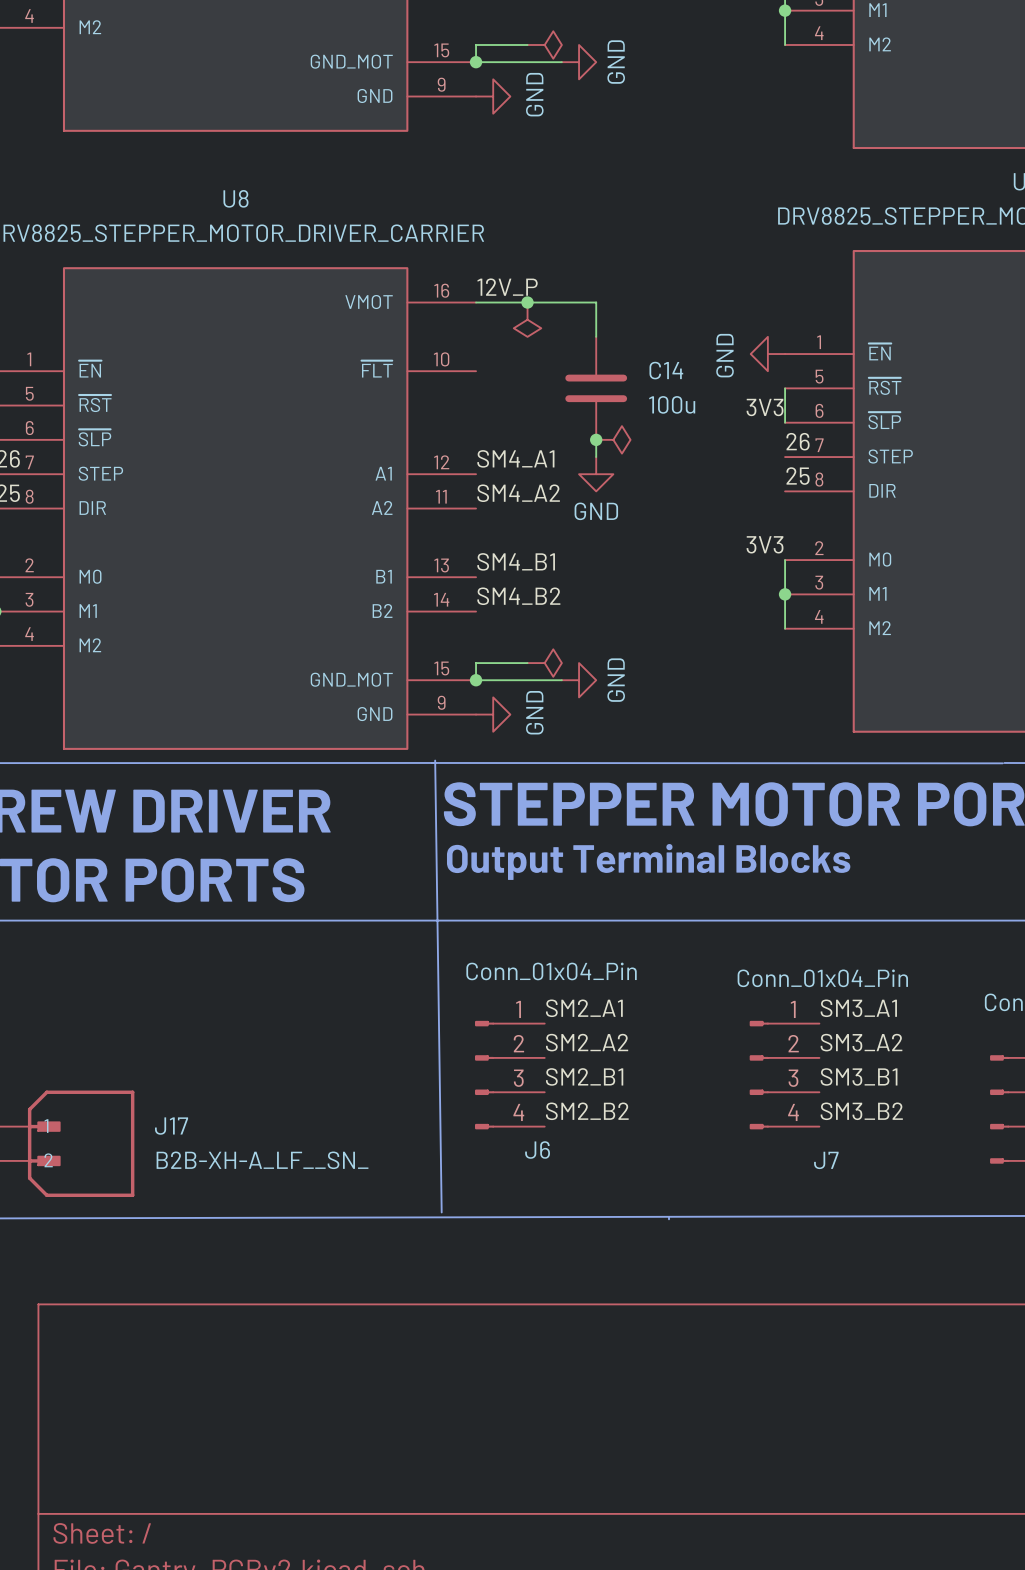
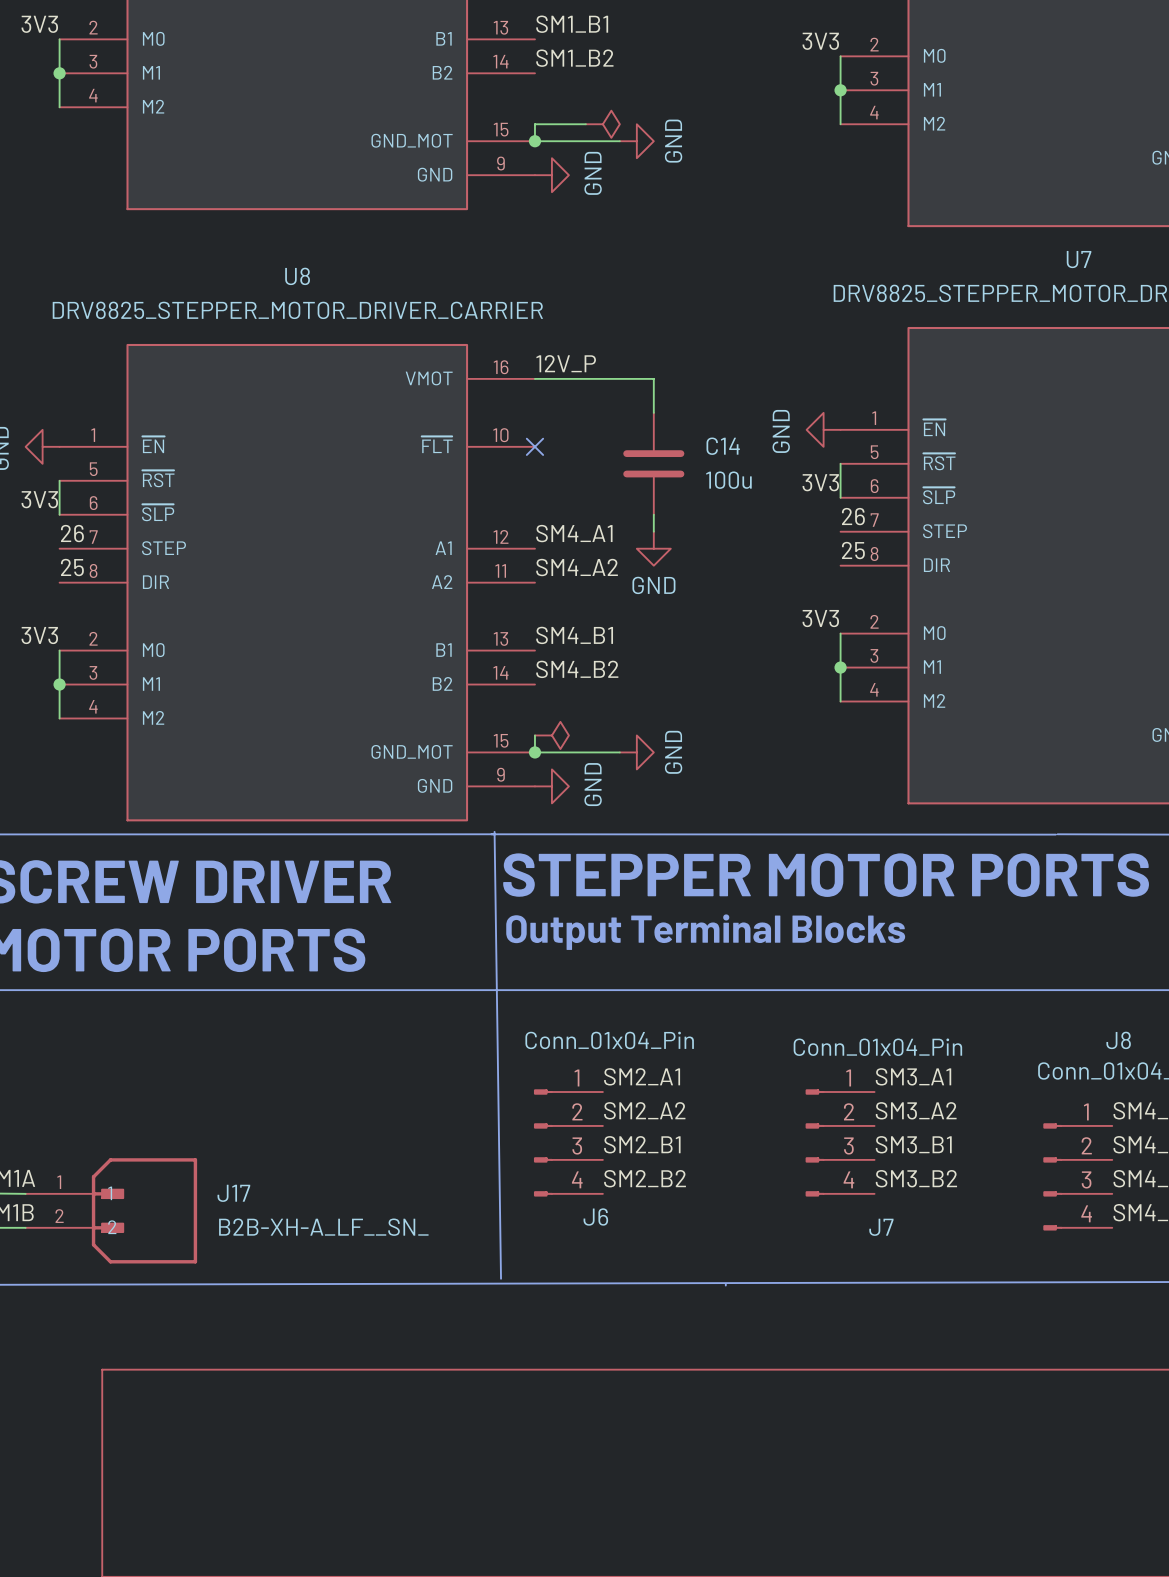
junction: (527, 302) -> none
power symbol: (527, 319) -> none
no-connect mark: none -> (534, 446)
junction: (596, 439) -> none
power symbol: (613, 439) -> none
wire: (476, 663) (527, 663) -> none
power symbol position: (544, 663) -> (551, 735)

